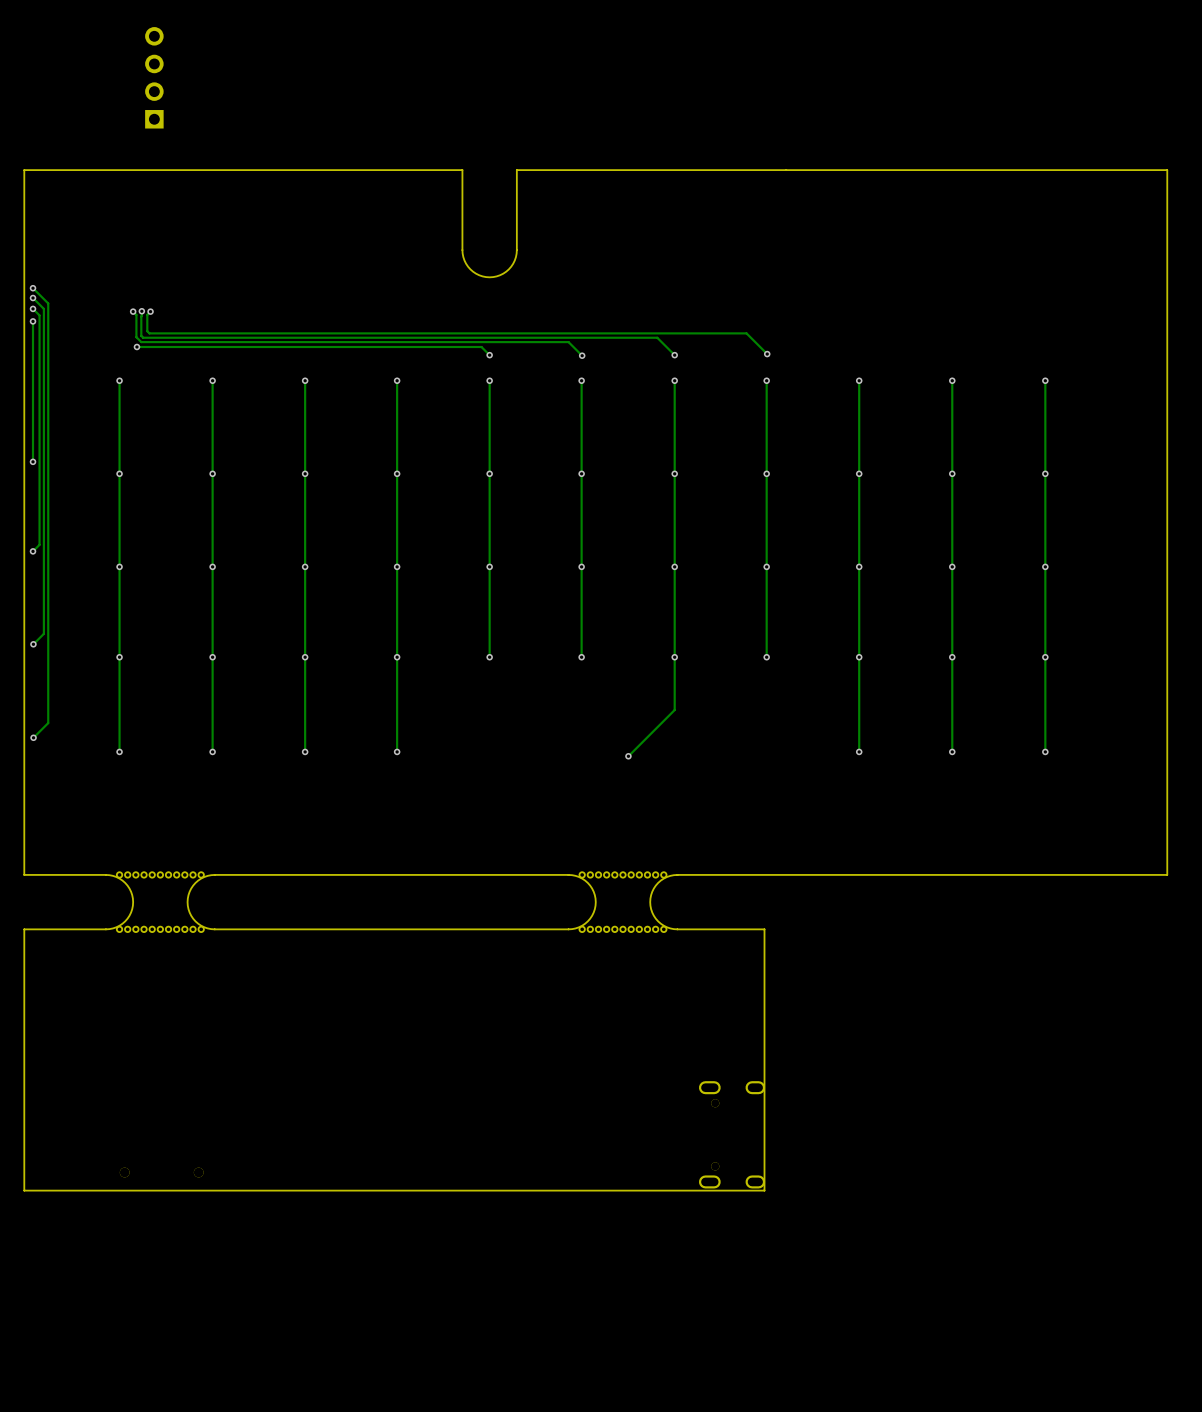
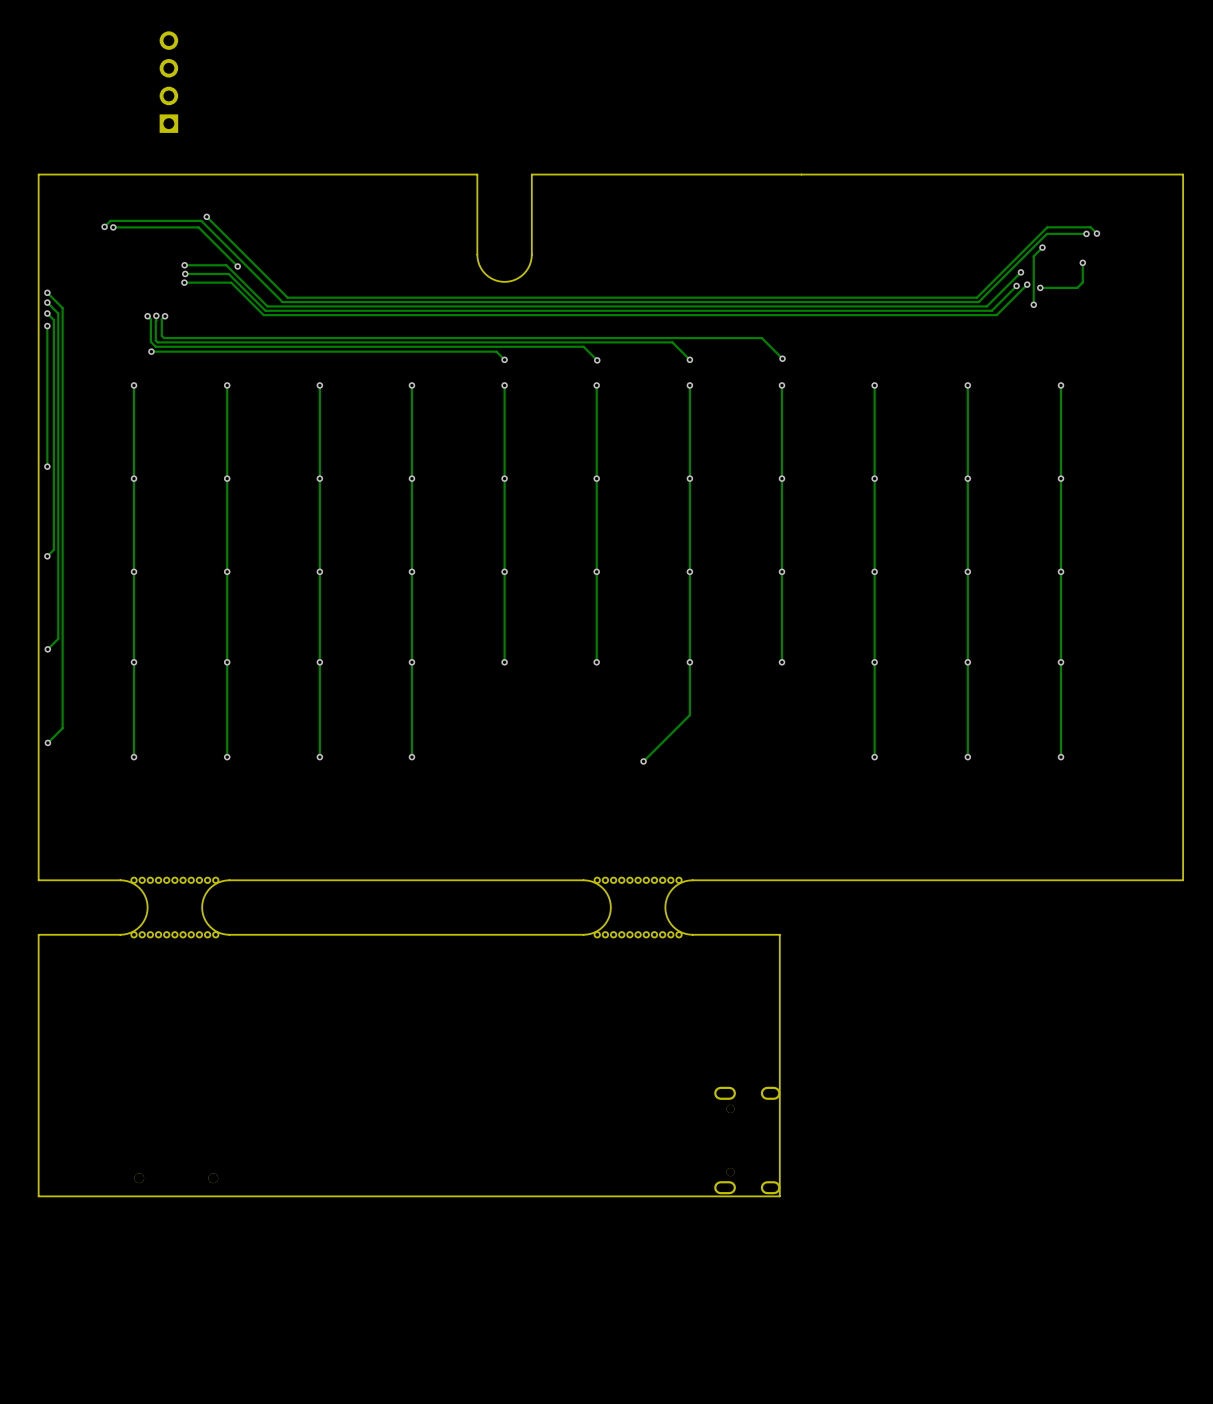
track: none -> (206, 216) (287, 297) (976, 297) (1047, 227) (1090, 227) (1096, 233)
via: none -> (206, 216)
track: none -> (104, 226) (110, 220) (201, 220) (282, 302) (978, 302) (1046, 233) (1086, 233)
via: none -> (104, 226)
track: none -> (113, 227) (198, 227) (237, 266)
via: none -> (113, 227)
via: none -> (1086, 233)
via: none -> (1096, 233)
track: none -> (1042, 247) (1033, 256) (1033, 304)
via: none -> (1042, 247)
track: none -> (1082, 262) (1082, 282) (1077, 287) (1040, 287)
via: none -> (1082, 262)
track: none -> (184, 265) (226, 265) (267, 306) (986, 306) (1020, 272)
via: none -> (184, 265)
via: none -> (237, 266)
via: none -> (1020, 272)
track: none -> (185, 273) (228, 273) (265, 310) (991, 310) (1016, 286)
via: none -> (185, 273)
track: none -> (184, 282) (231, 282) (263, 315) (996, 315) (1027, 284)
via: none -> (184, 282)
via: none -> (1027, 284)
via: none -> (1016, 286)
via: none -> (1040, 287)
via: none -> (1033, 304)

